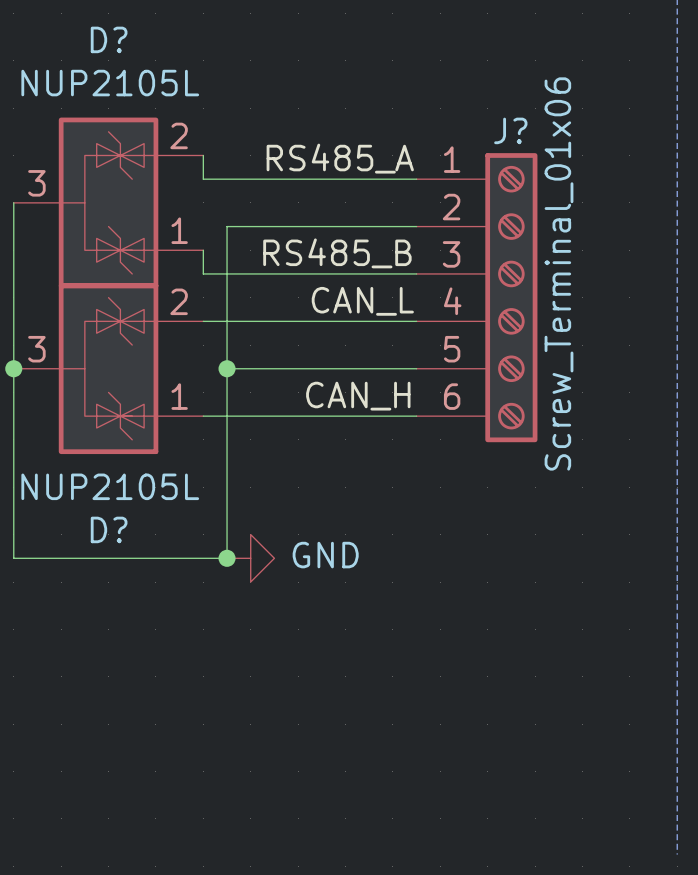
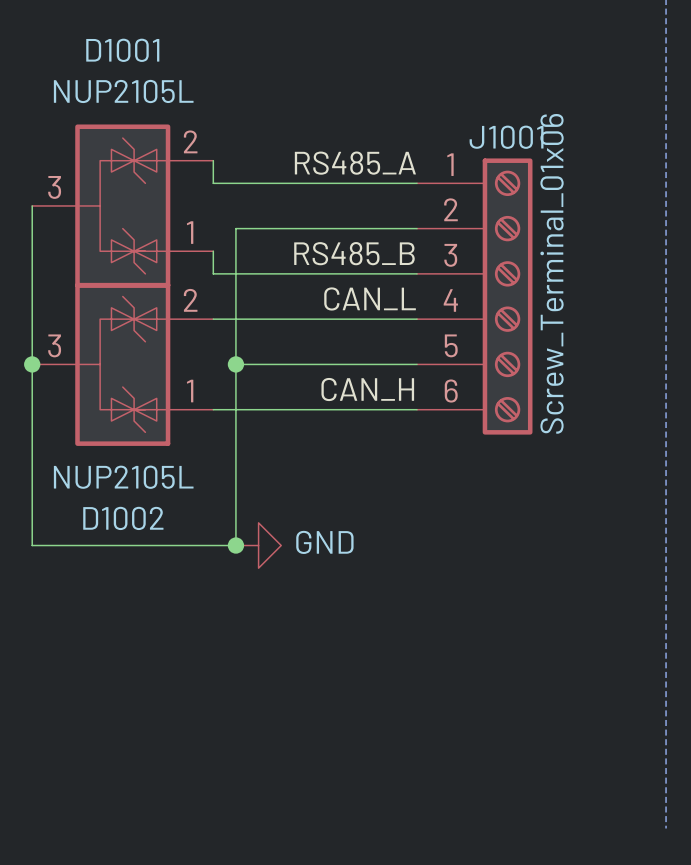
D? name: D? (109, 39) -> D1001 (122, 50)
J? name: J? (510, 130) -> J1001 (506, 137)
D? name: D? (109, 529) -> D1002 (123, 518)

